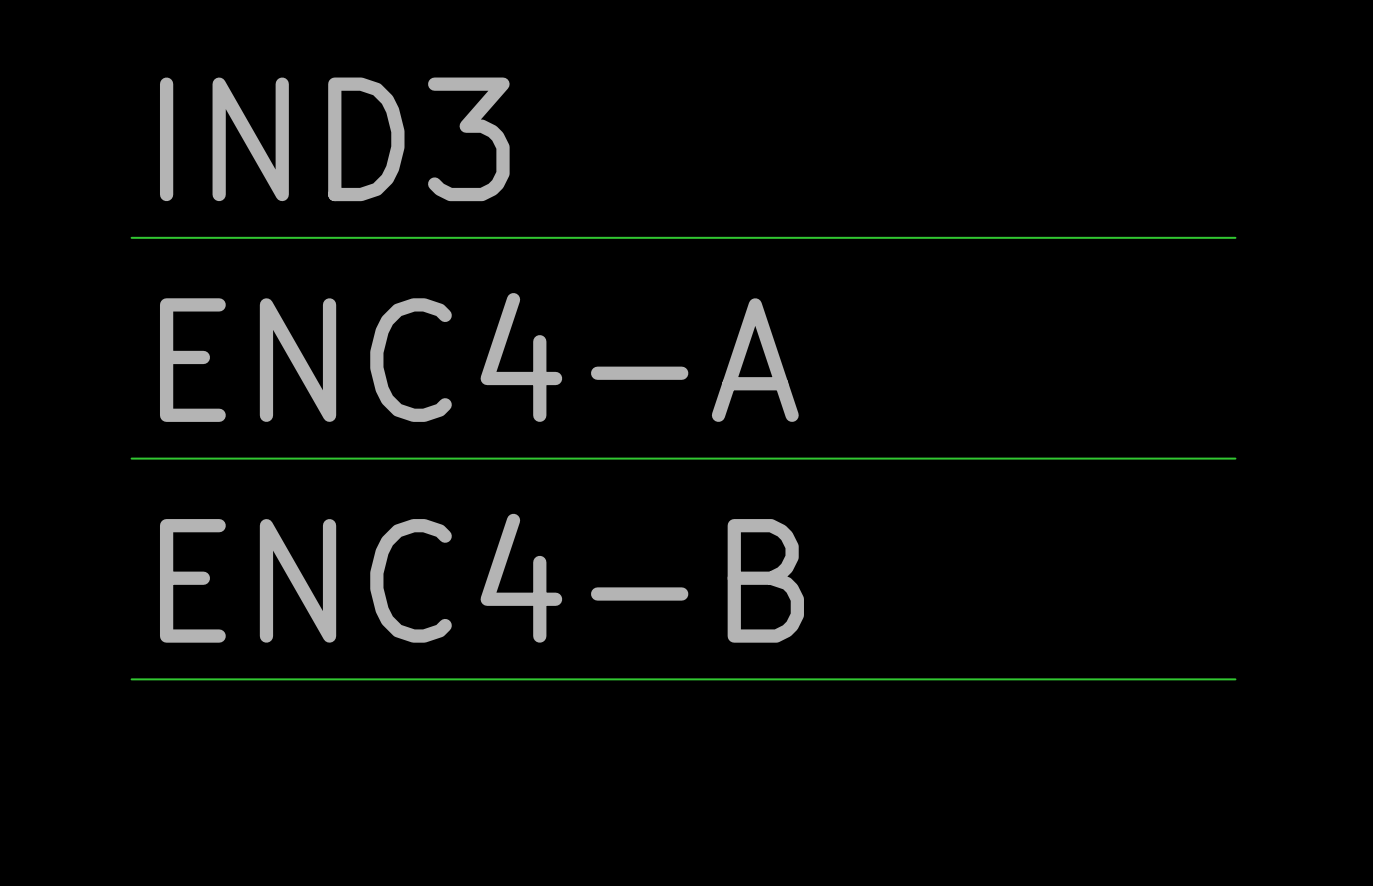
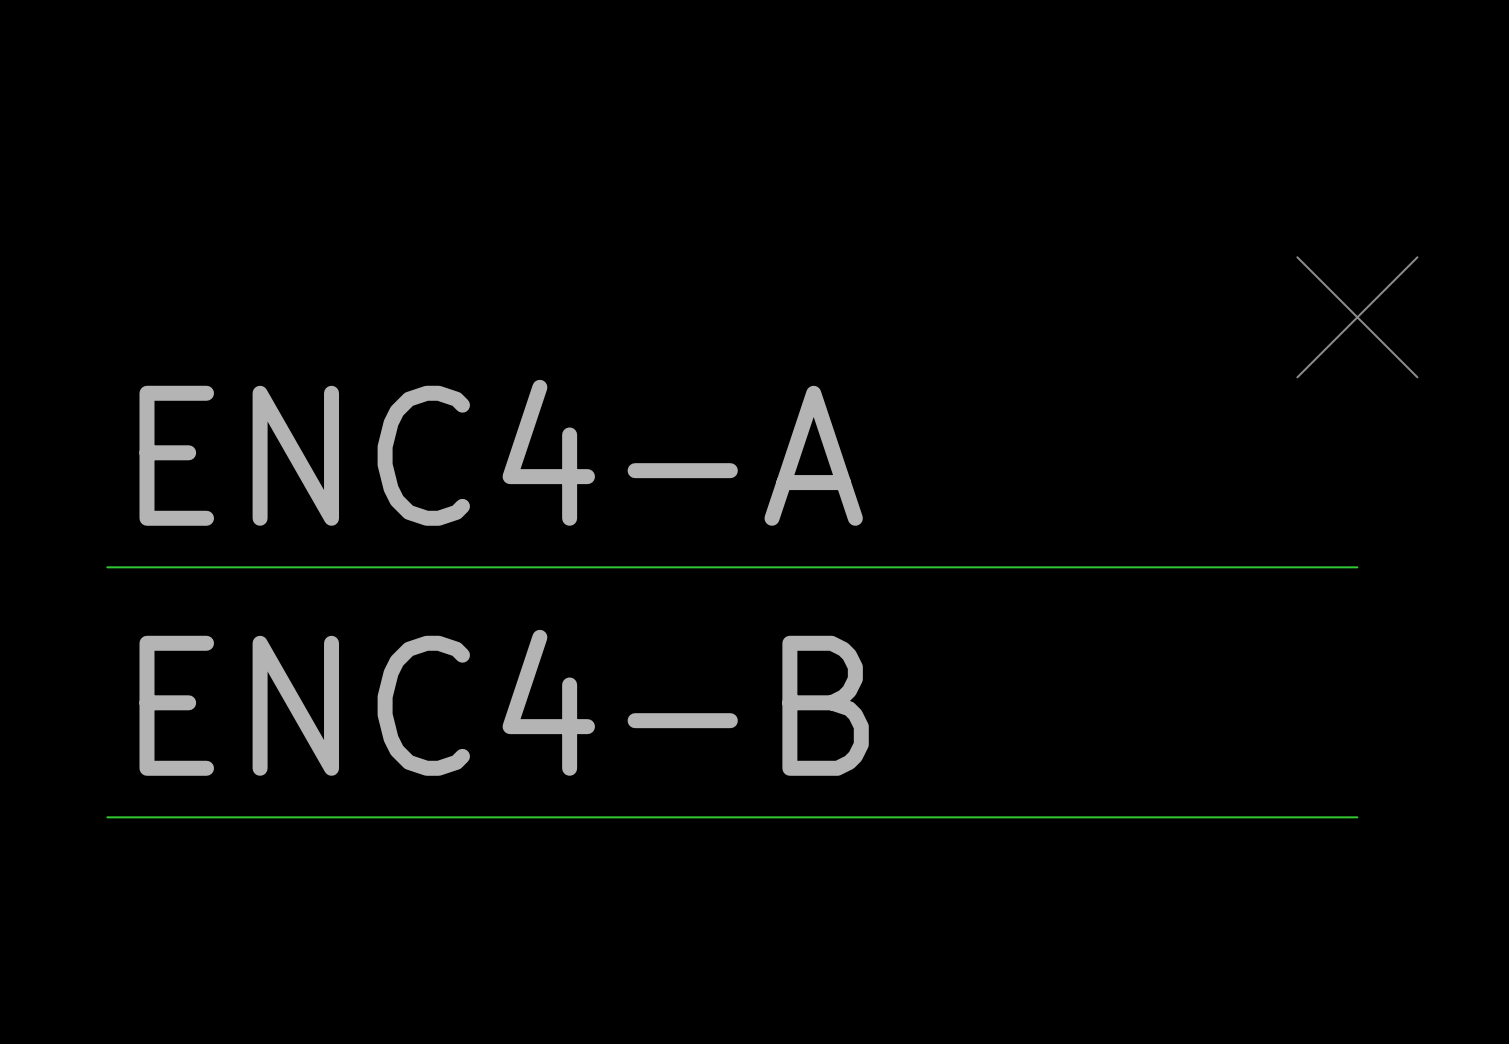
label: IND3 (334, 139) -> none
wire: (131, 237) (1235, 237) -> none
no-connect mark: none -> (1357, 317)

